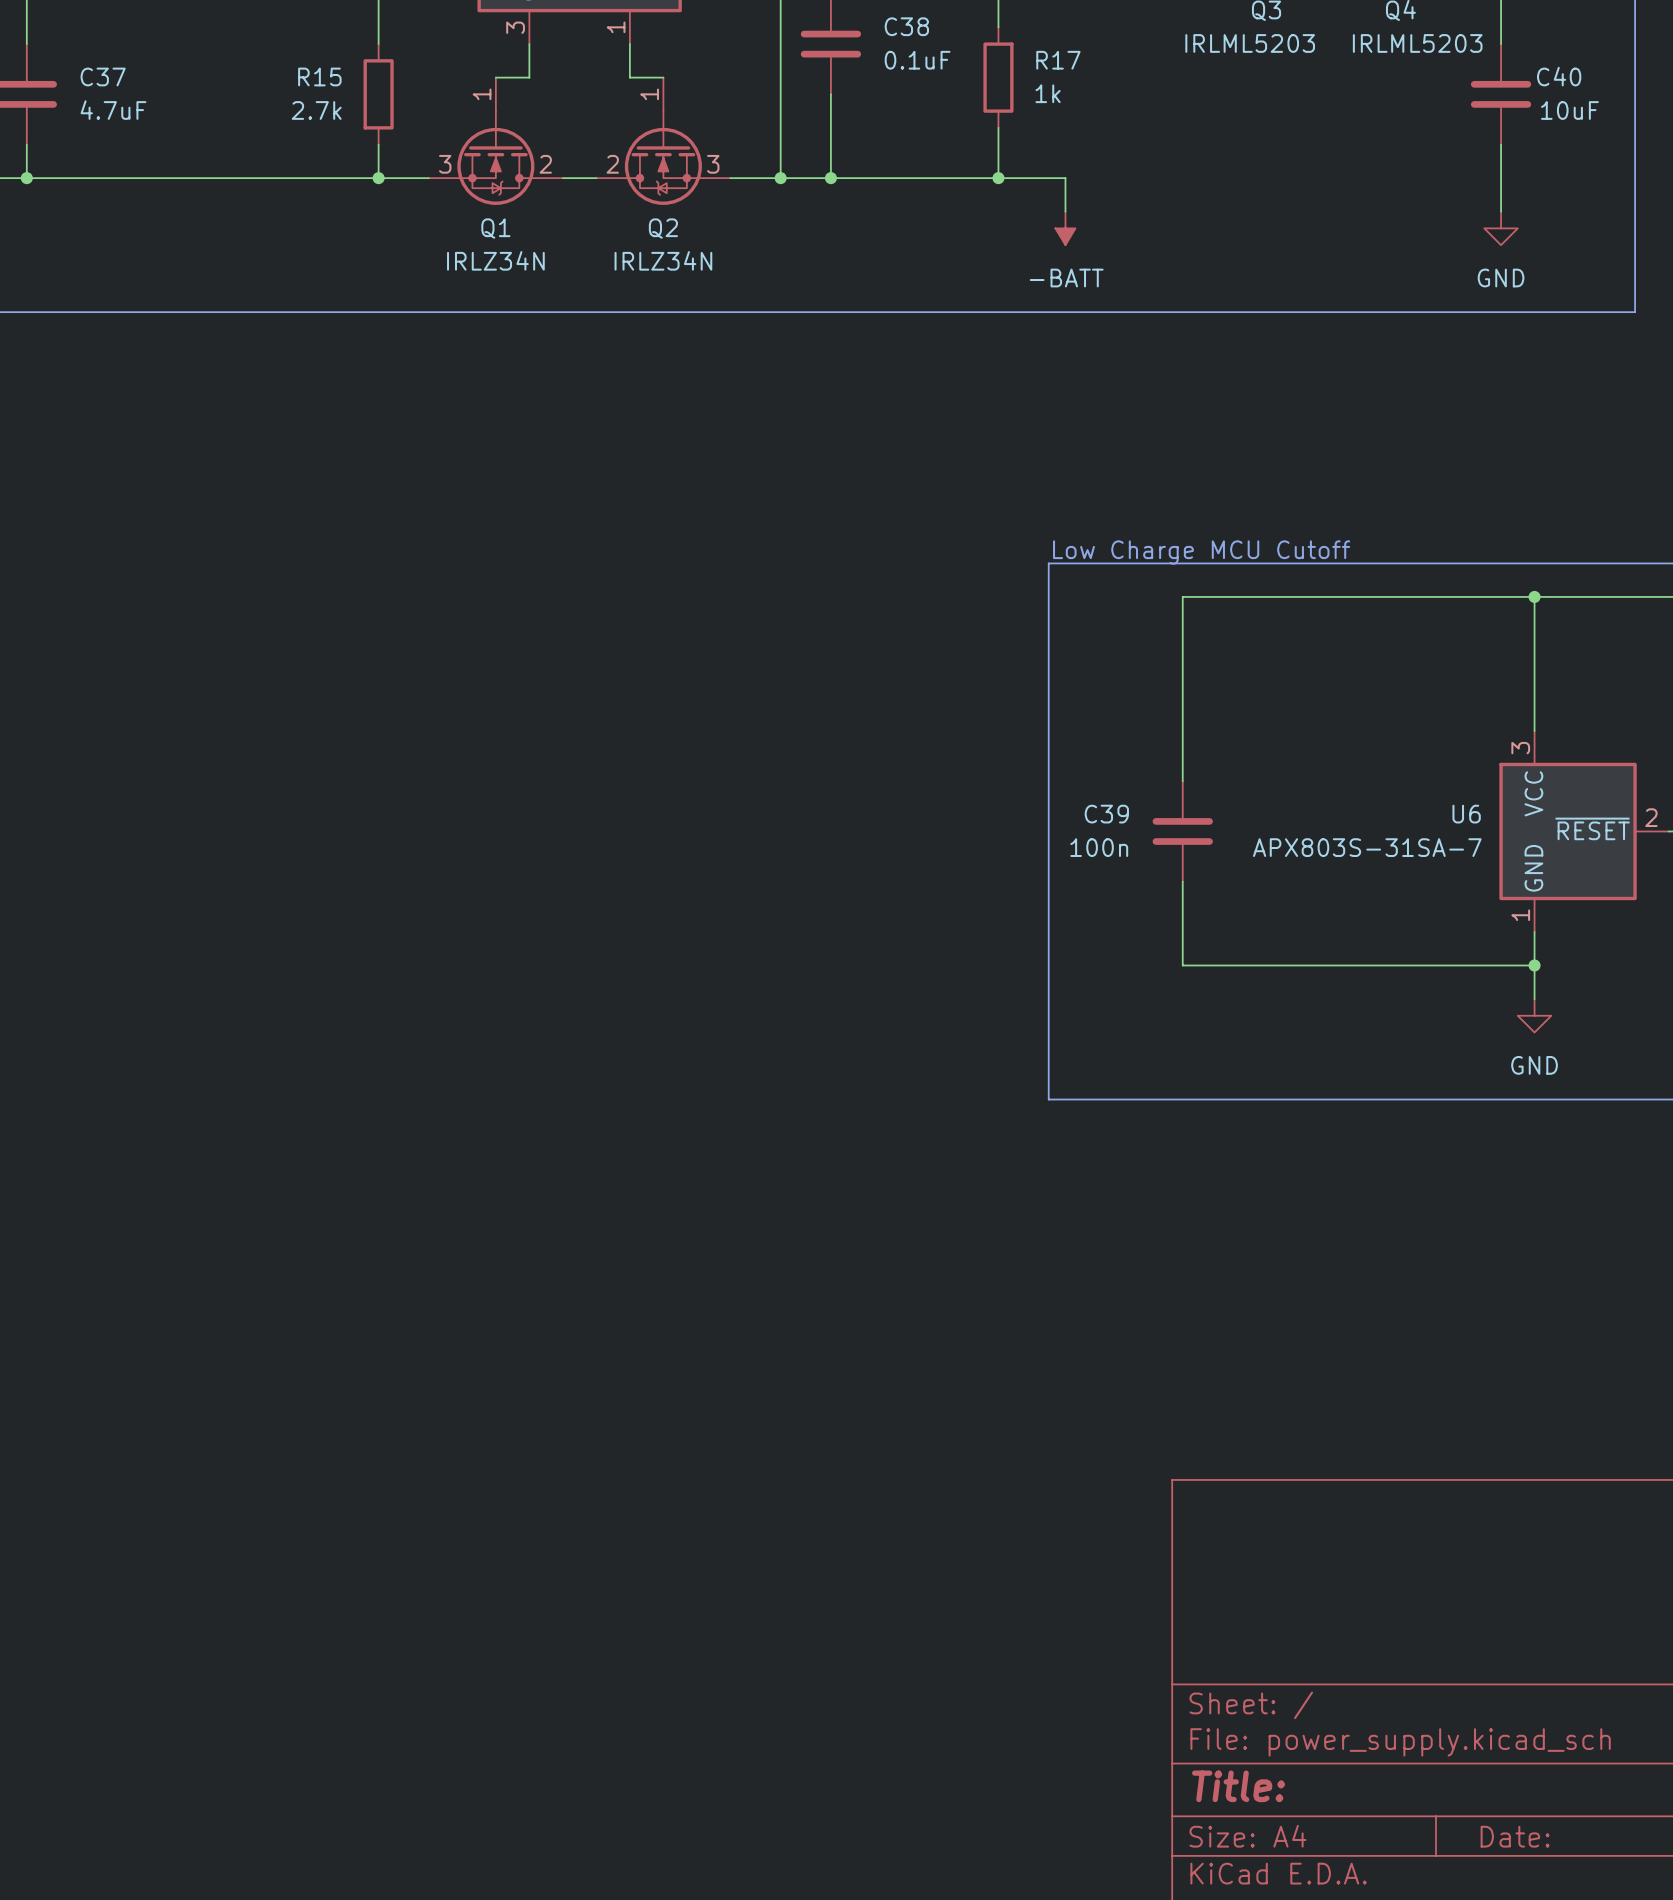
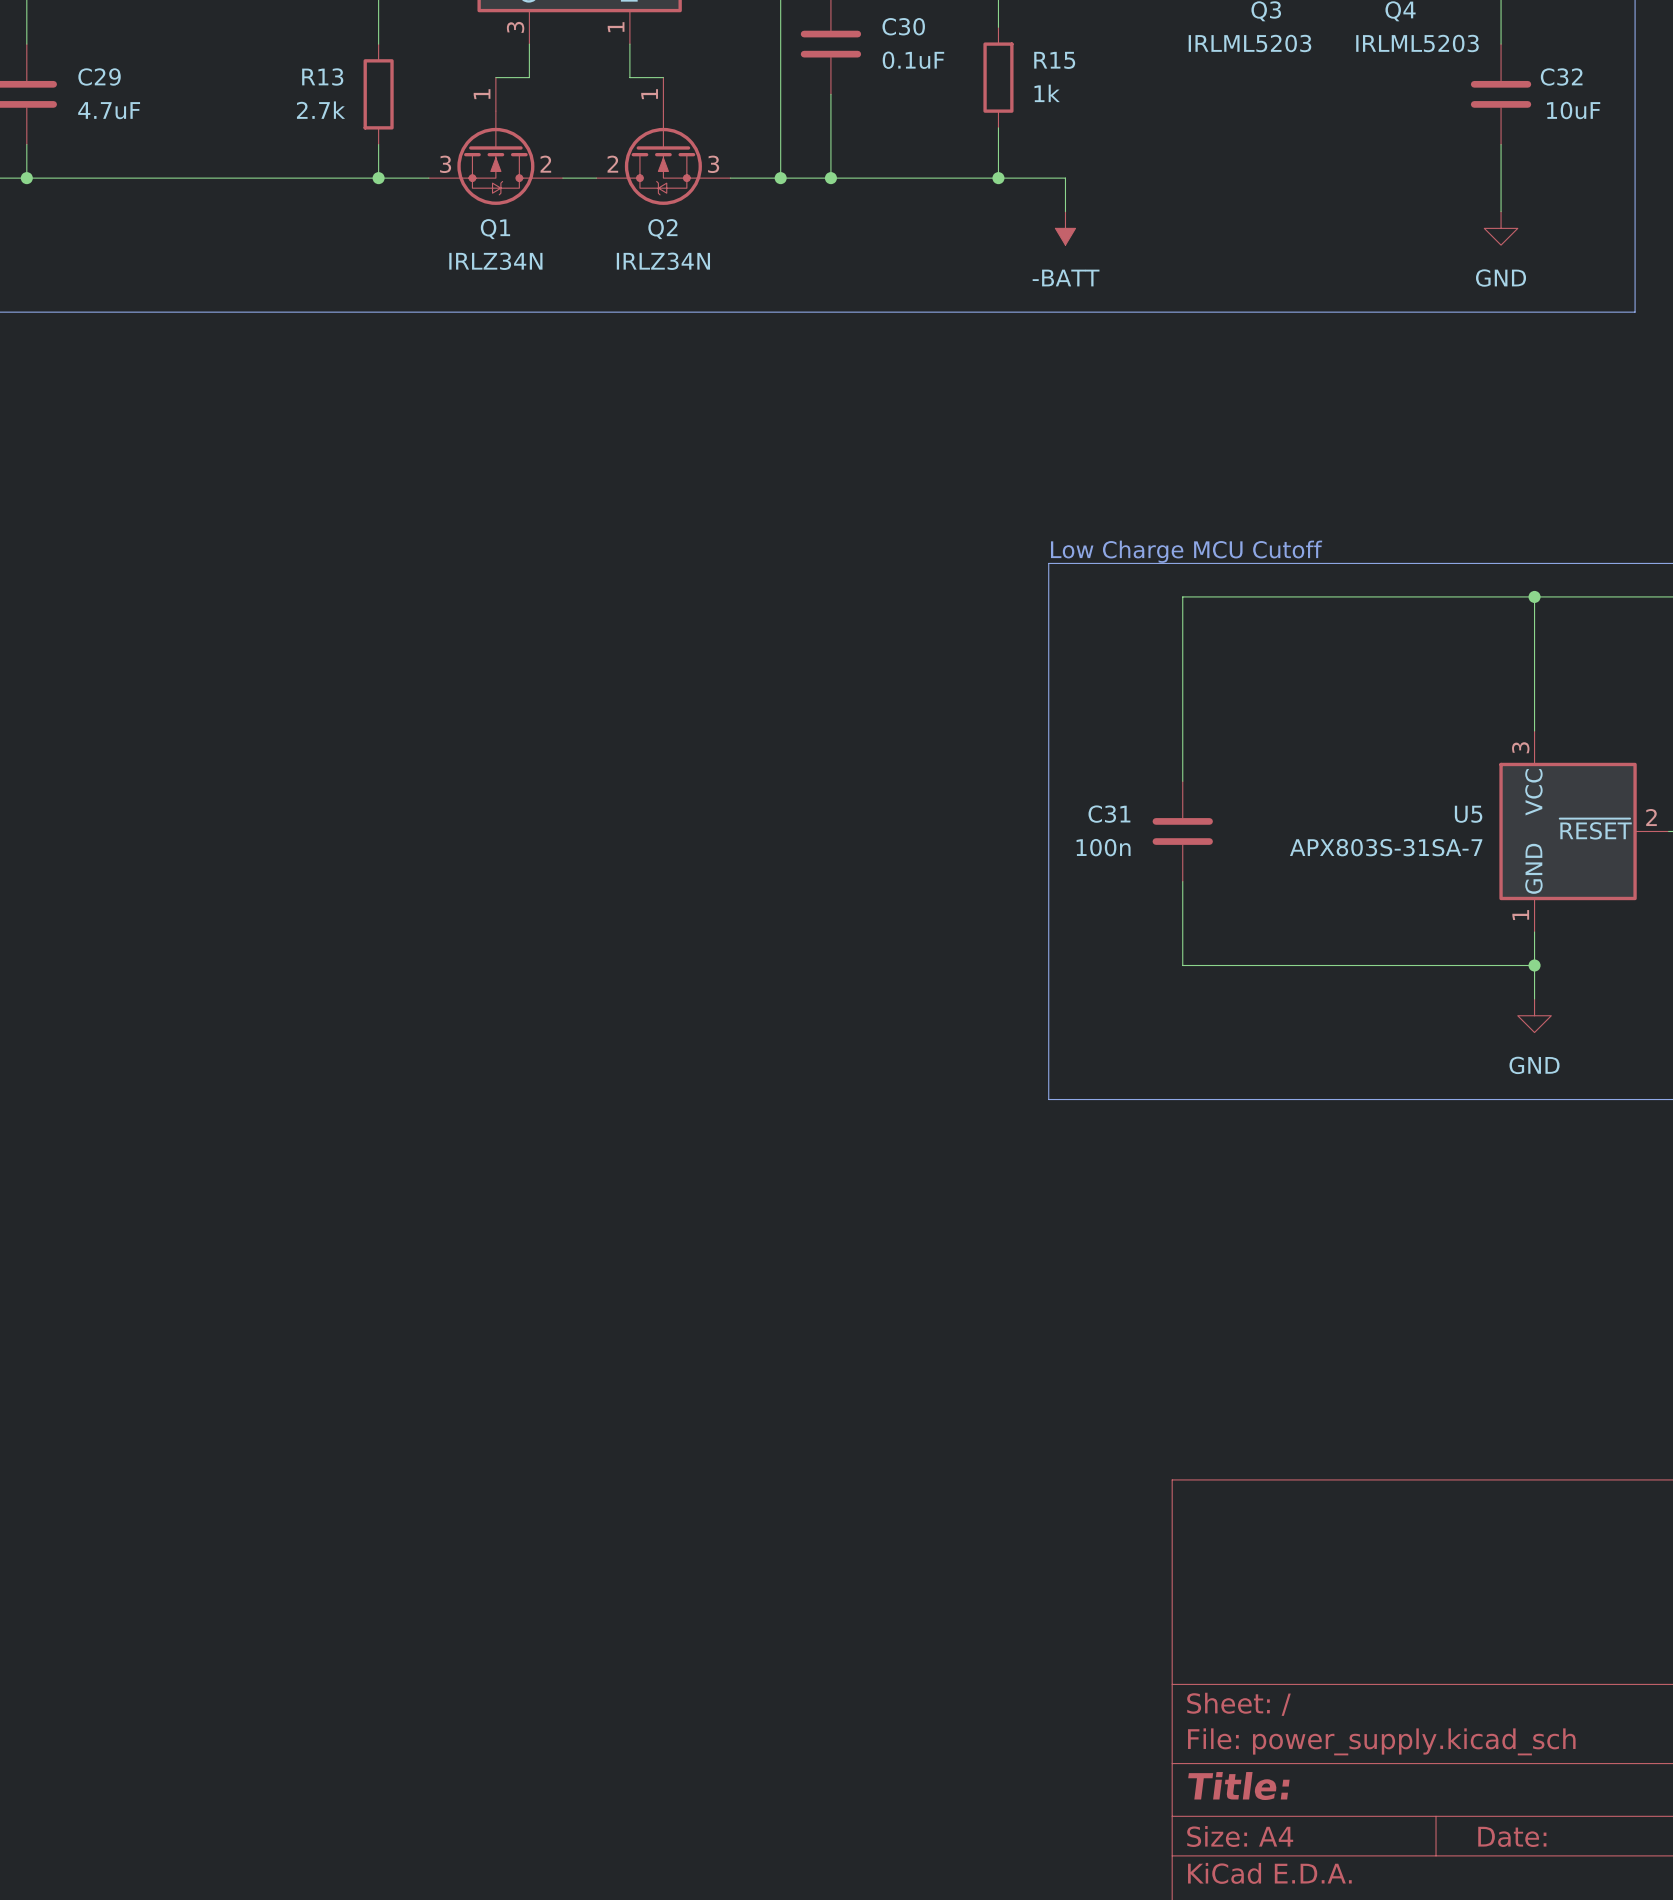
C38 name: C38 (906, 26) -> C30 (903, 26)
R17 name: R17 (1058, 60) -> R15 (1054, 60)
C37 name: C37 (103, 76) -> C29 (99, 76)
R15 name: R15 (319, 76) -> R13 (322, 76)
C40 name: C40 (1559, 76) -> C32 (1561, 76)
C39 name: C39 (1106, 814) -> C31 (1109, 814)
U6 name: U6 (1466, 814) -> U5 (1468, 814)

